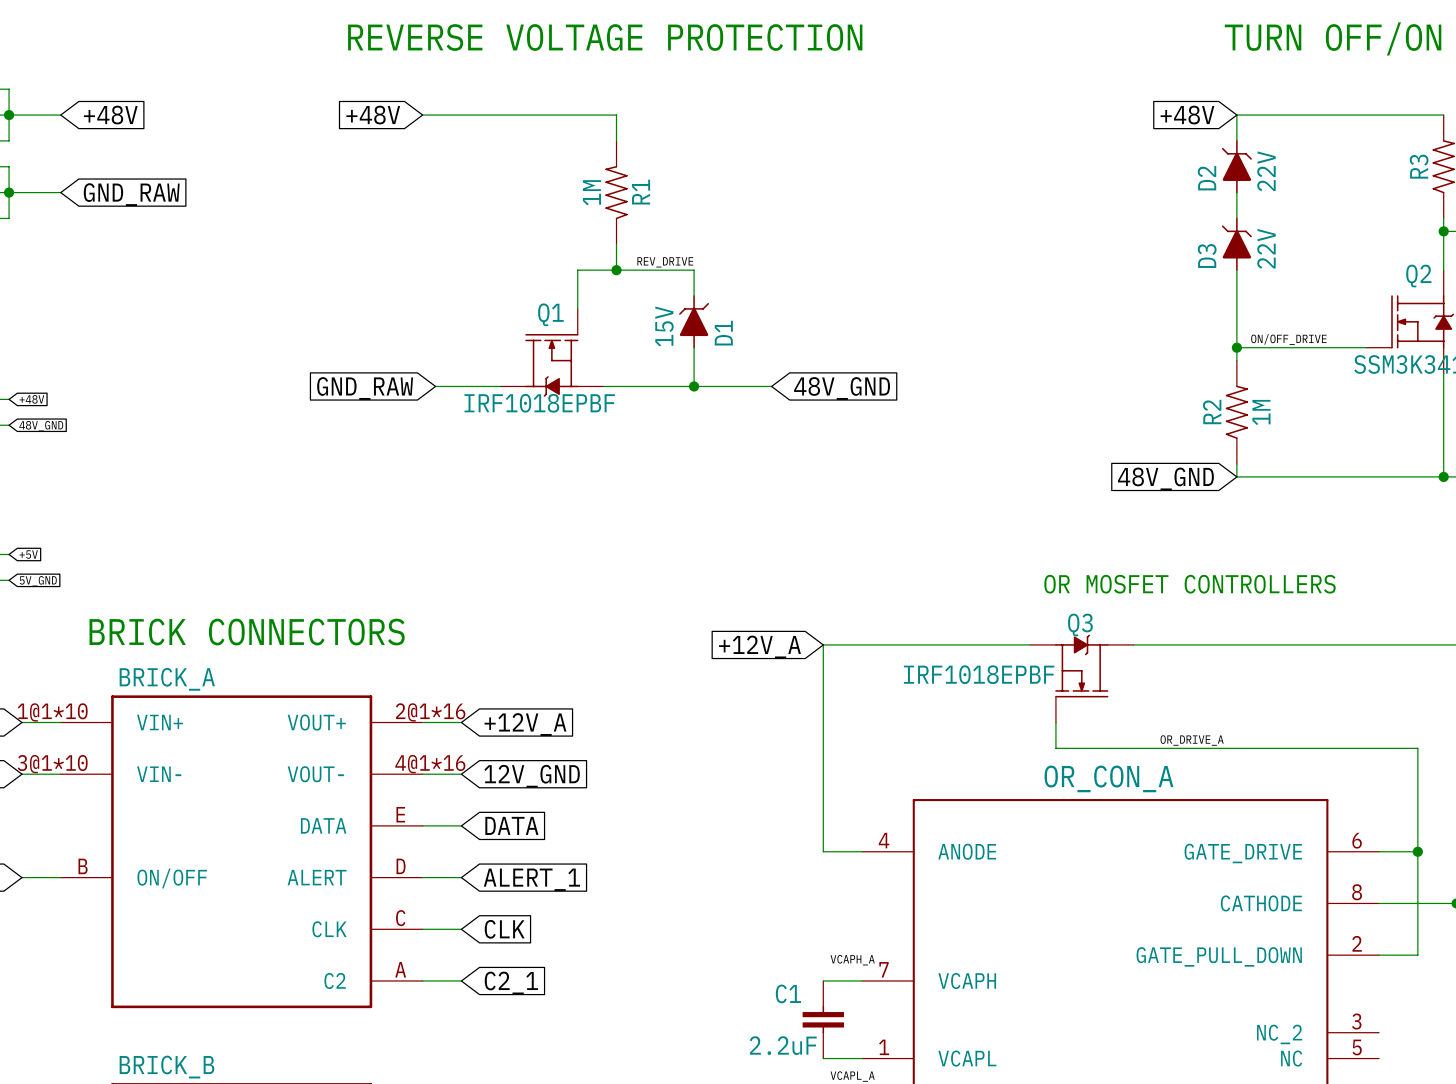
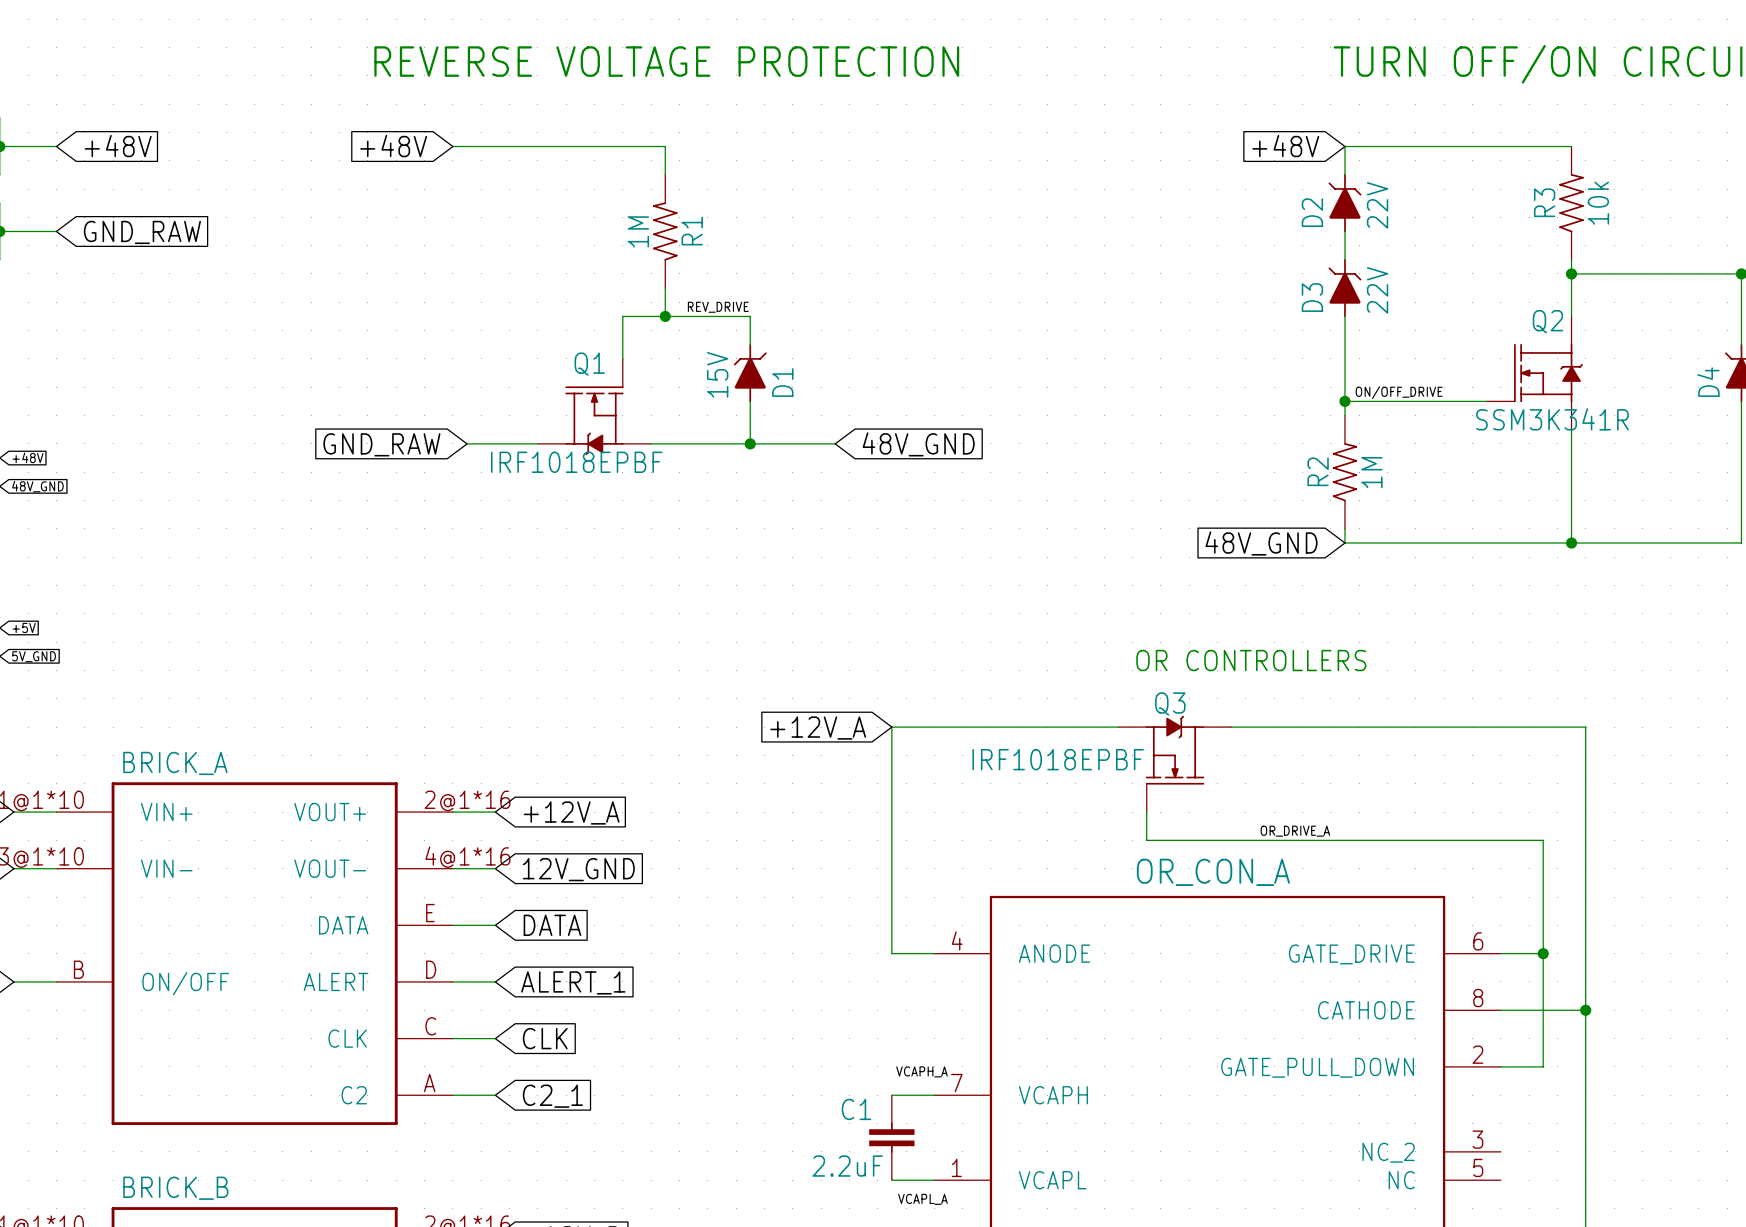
text: OR MOSFET CONTROLLERS (1189, 584) -> OR CONTROLLERS (1251, 660)
text: BRICK CONNECTORS (247, 632) -> none

